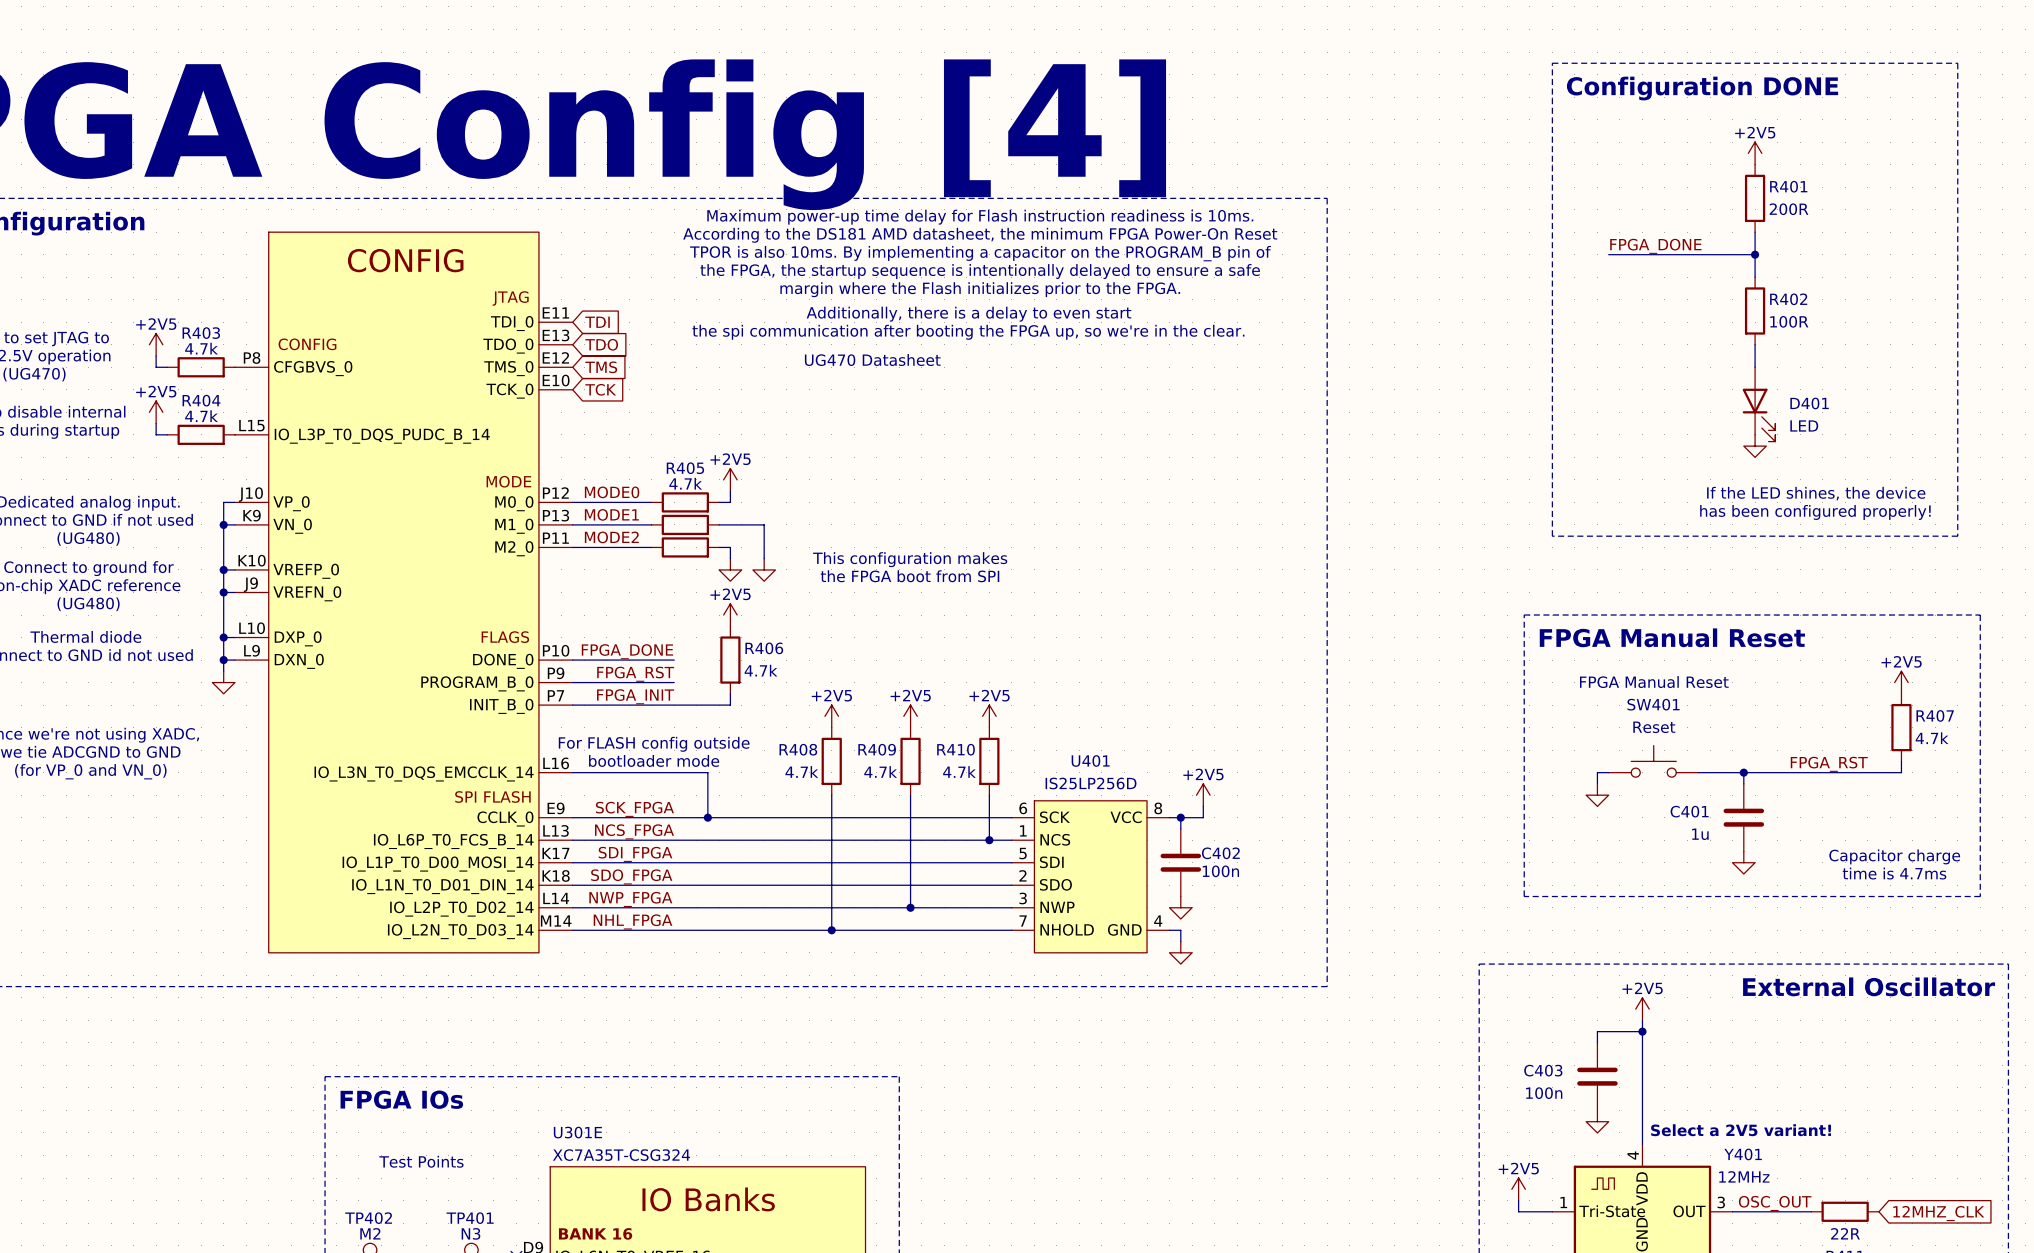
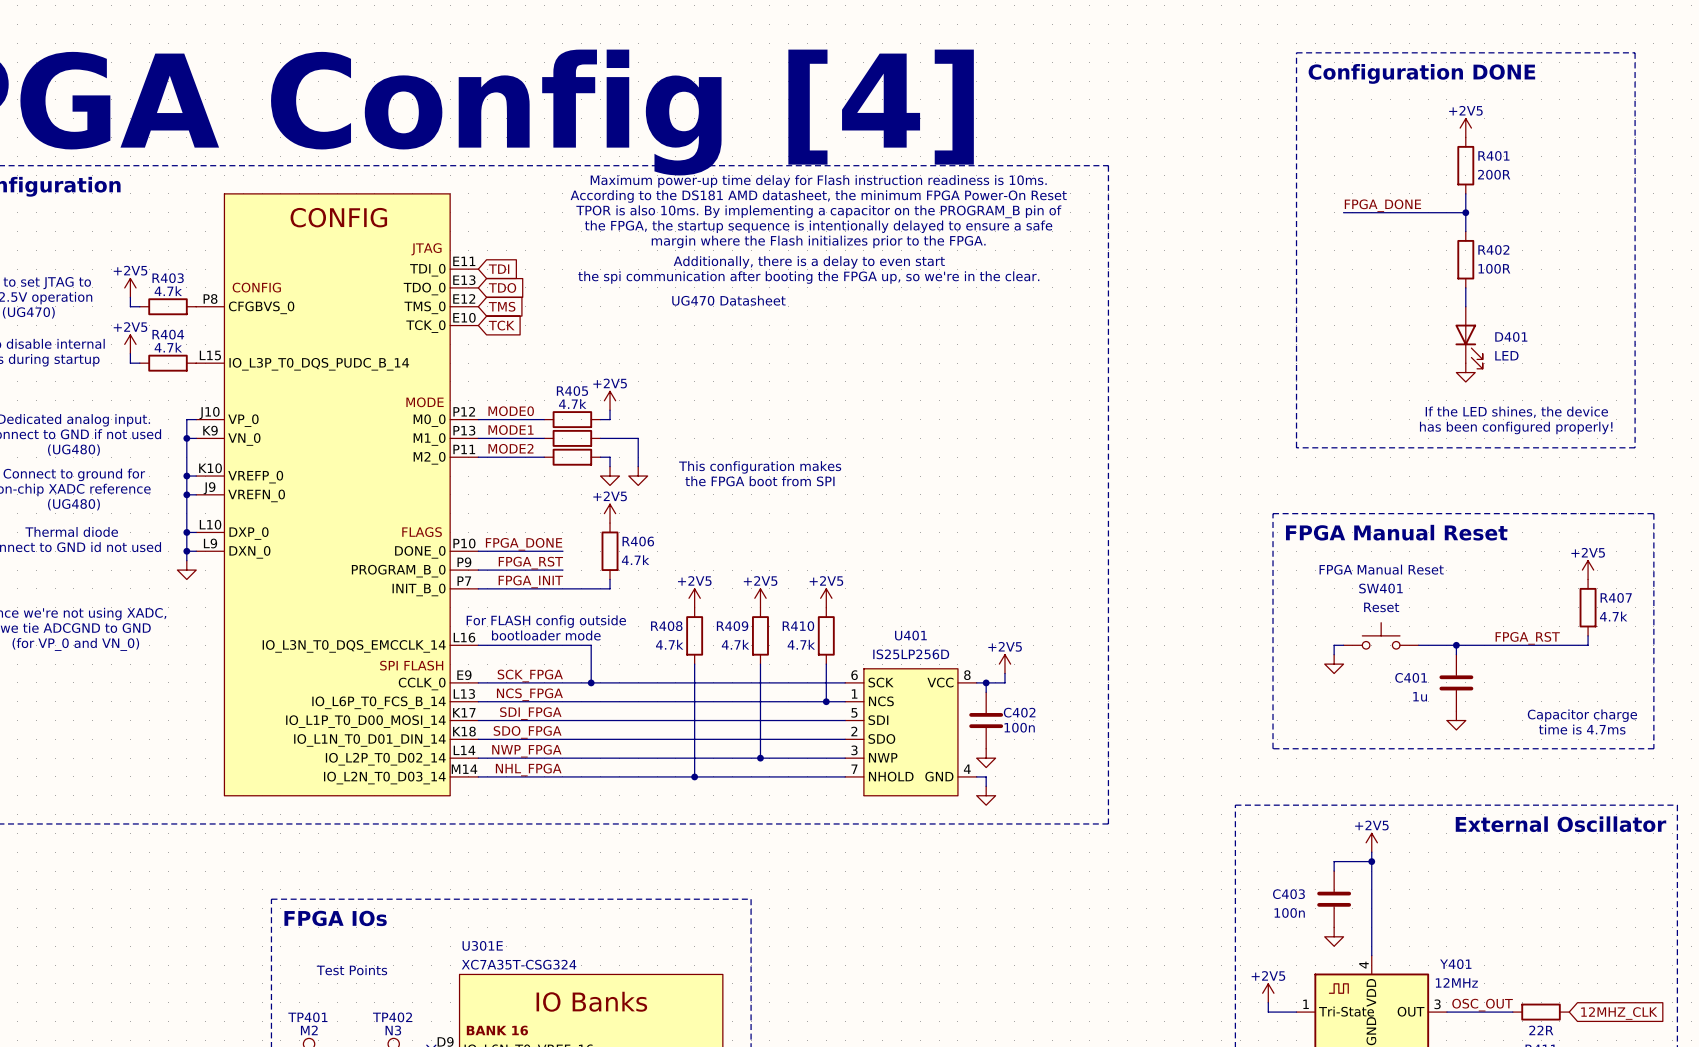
text: Select a 2V5 variant! (1741, 1130) -> none
TP402 name: TP402 (368, 1218) -> TP401 (307, 1017)
TP401 name: TP401 (470, 1218) -> TP402 (392, 1017)

